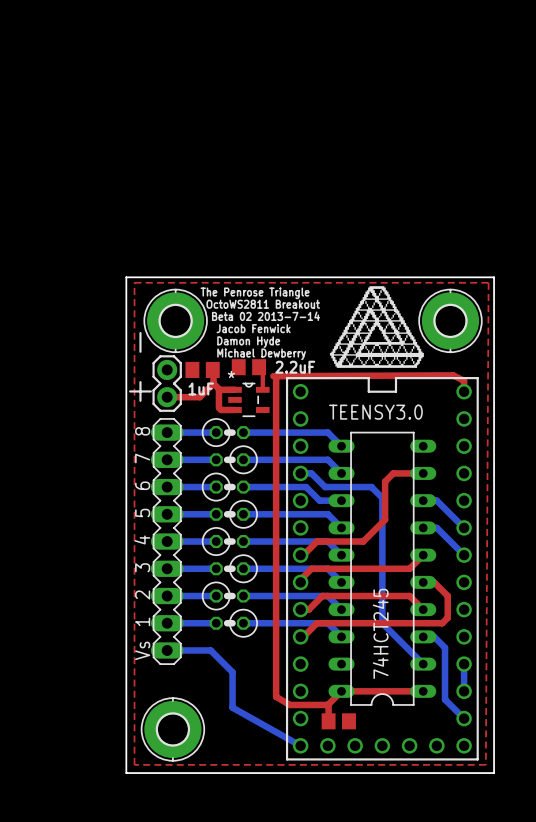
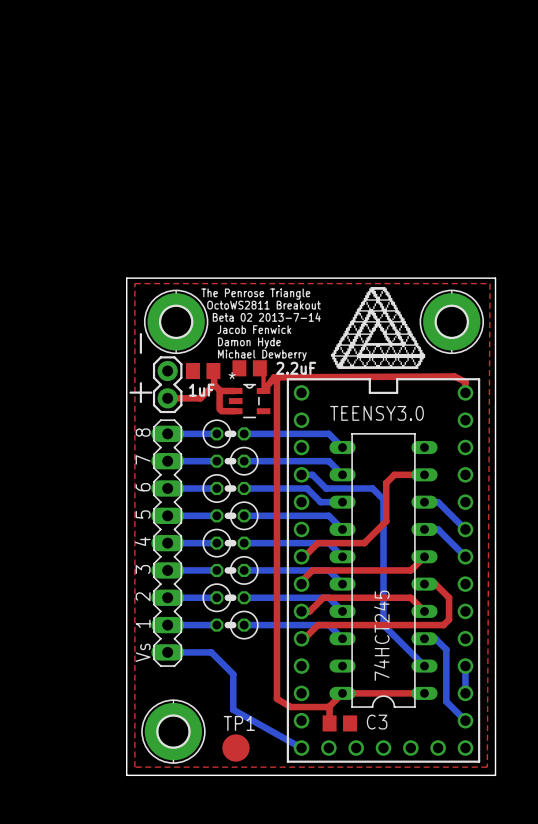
top track: none -> (274, 377) (263, 390)
C3 name: none -> C3 (377, 722)
TP1: none -> (235, 748)

